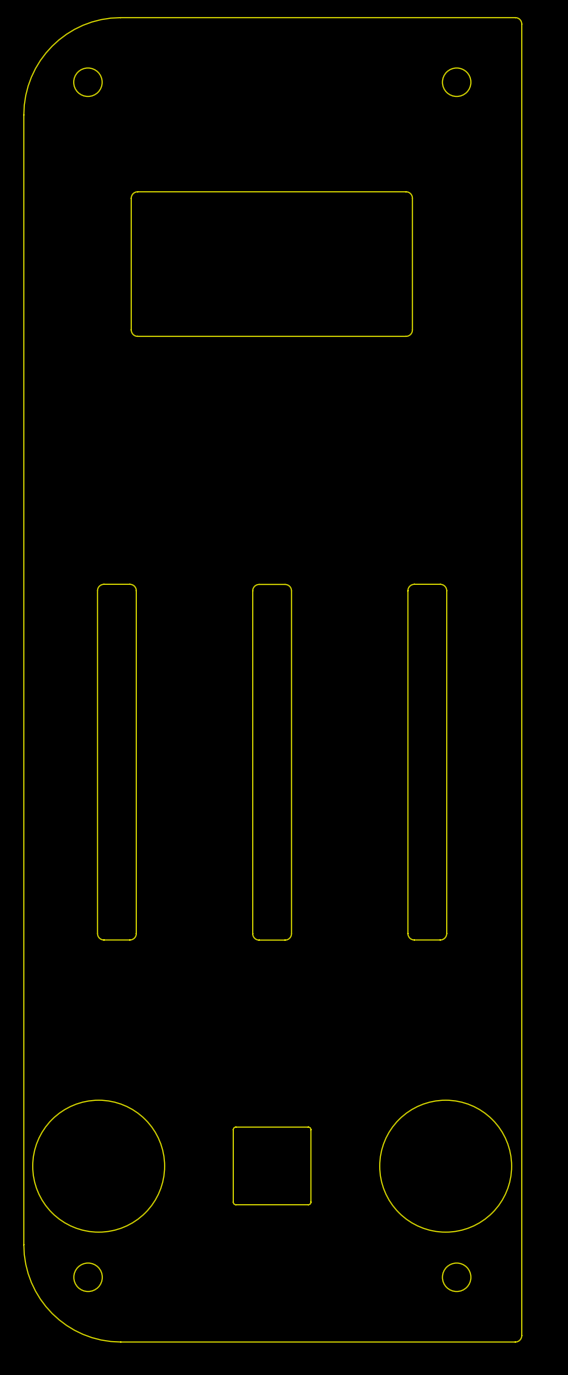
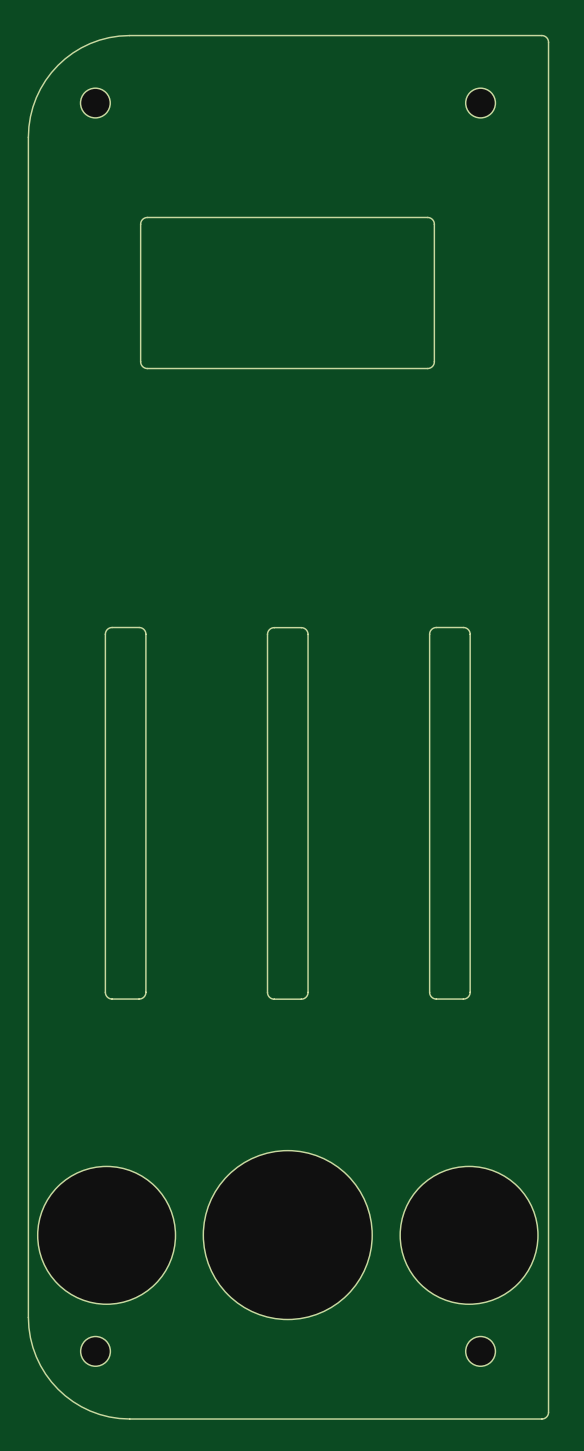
drawing: [232, 1126, 312, 1206] -> none
part: none -> (287, 1235)

